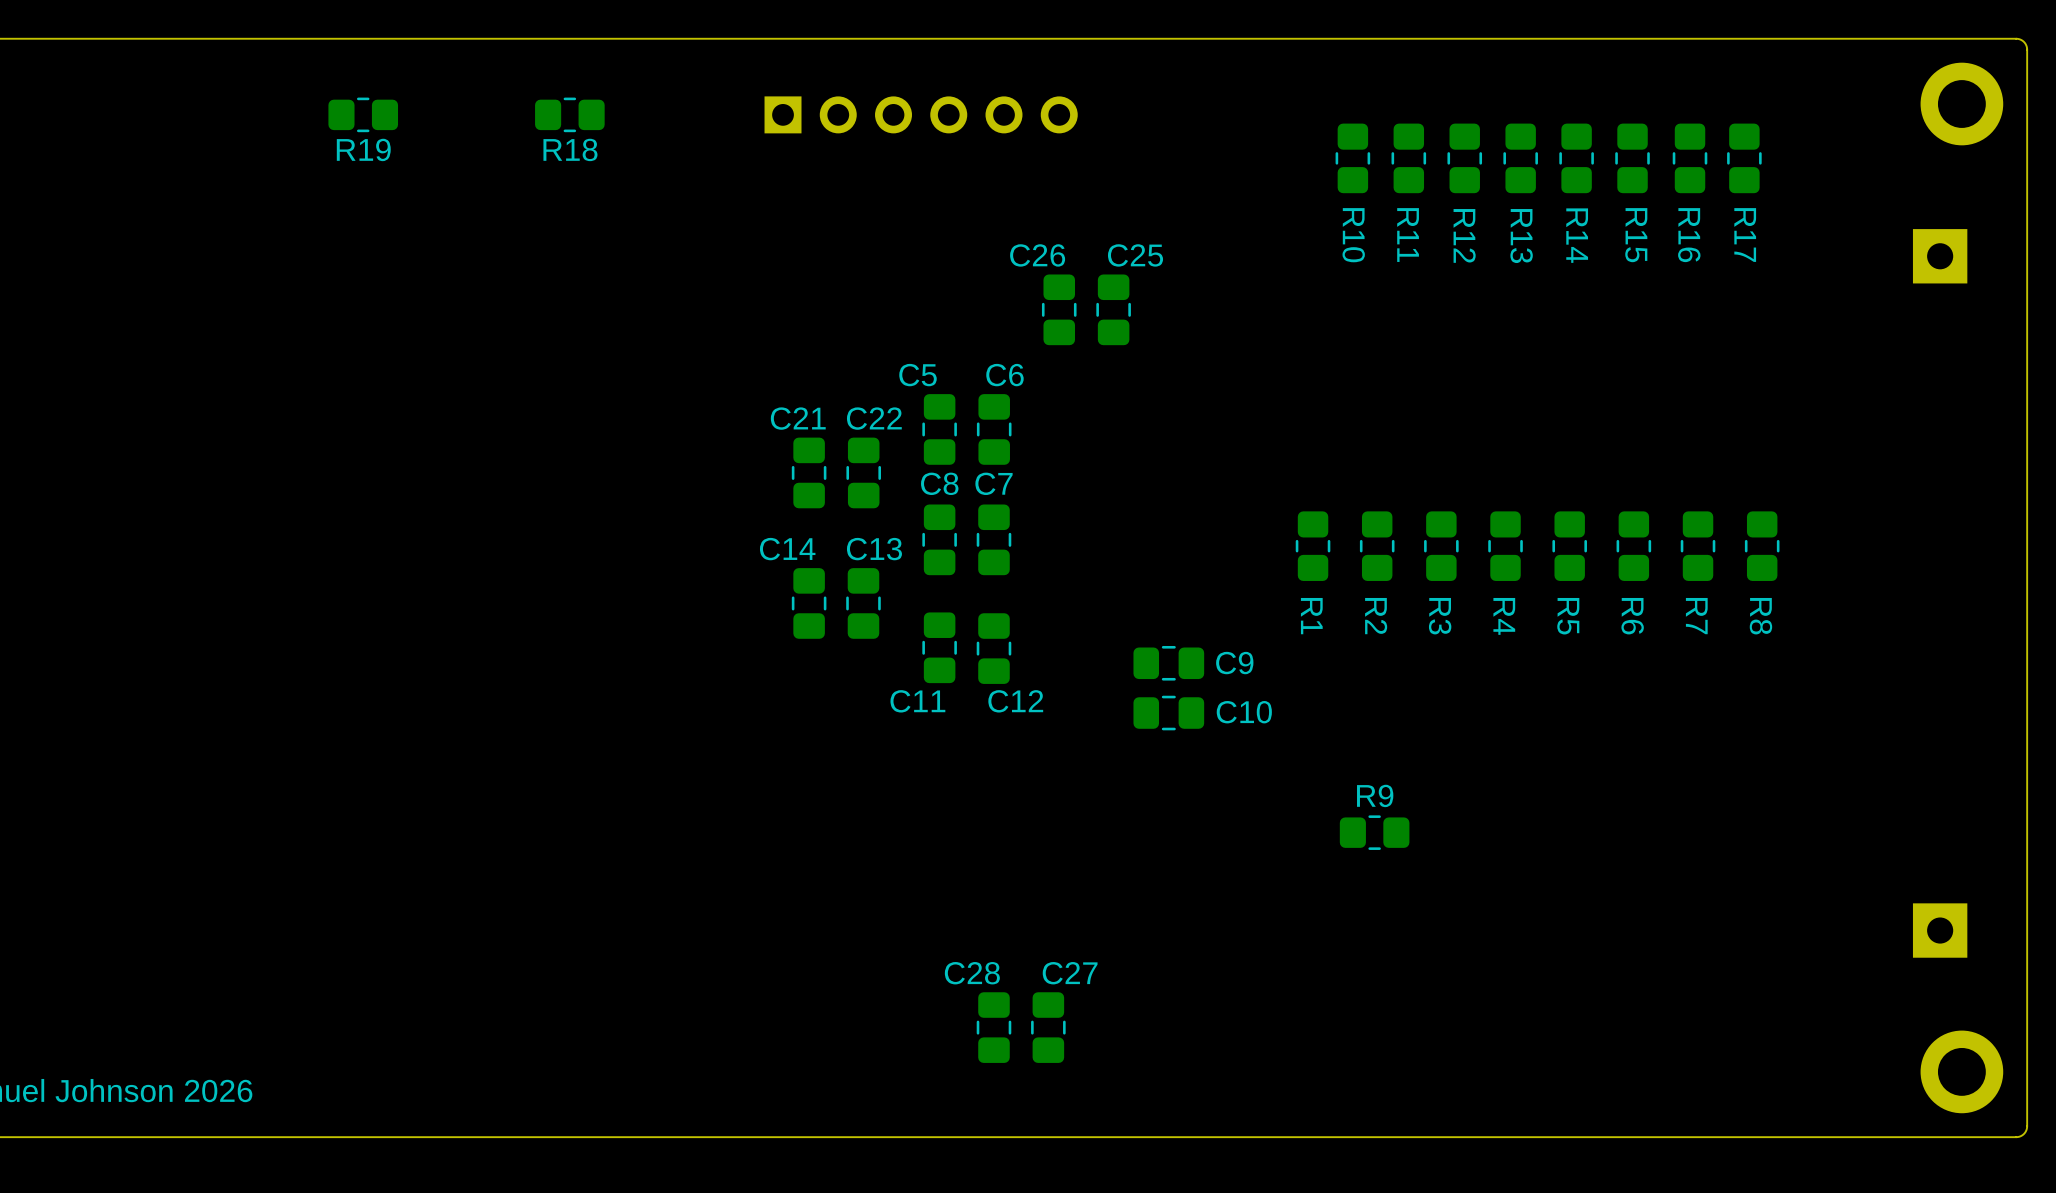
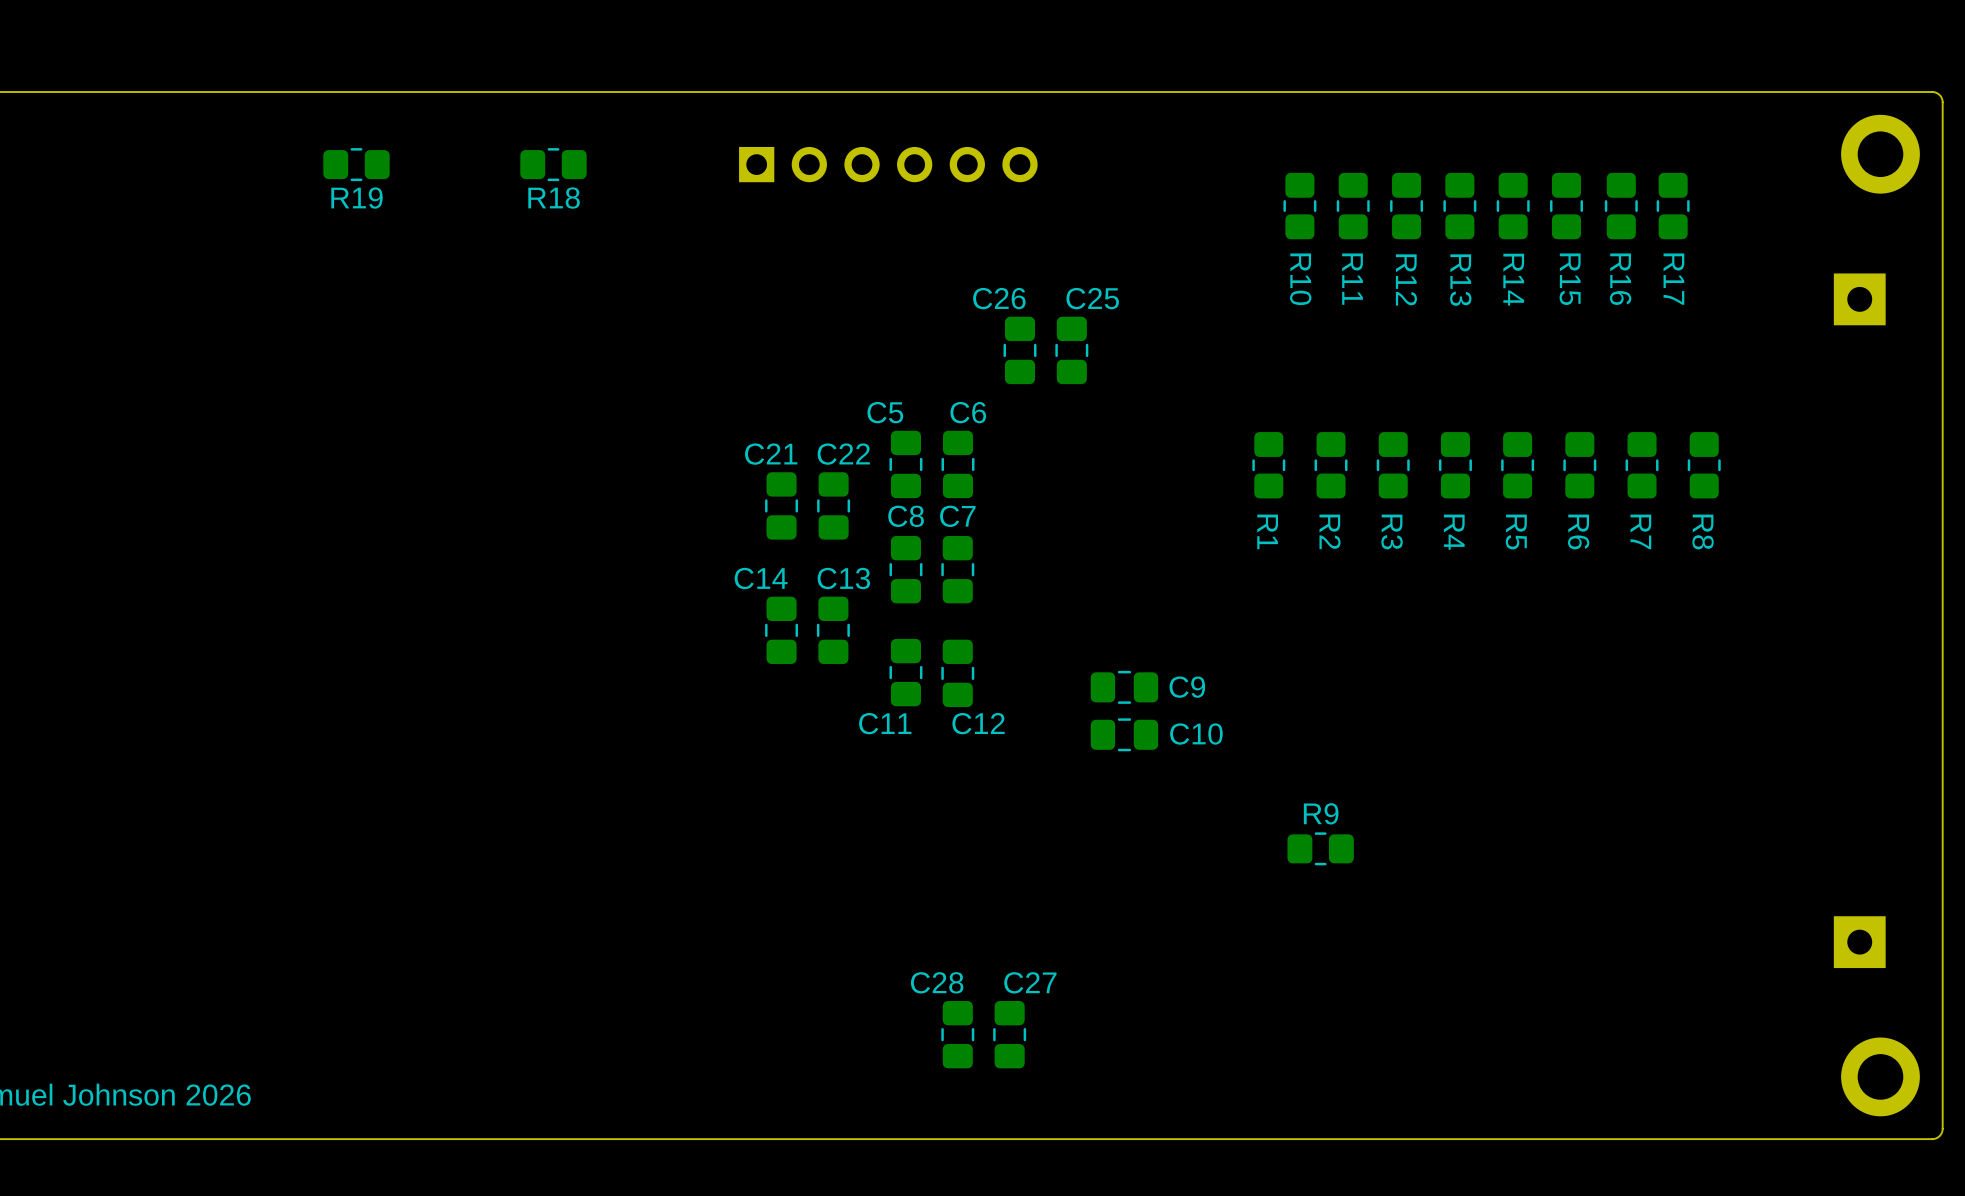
R1 position: (1313, 546) -> (1268, 465)
R2 position: (1377, 546) -> (1331, 465)
R3 position: (1441, 546) -> (1393, 465)
R4 position: (1505, 546) -> (1455, 465)
R5 position: (1569, 546) -> (1517, 465)
R6 position: (1633, 546) -> (1579, 465)
R7 position: (1698, 546) -> (1642, 465)
R8 position: (1762, 546) -> (1704, 465)

